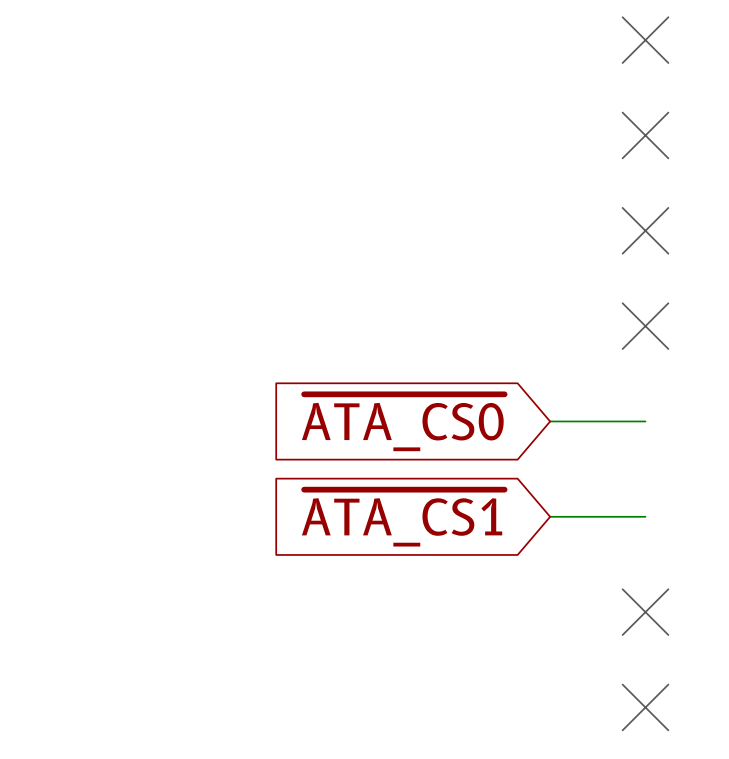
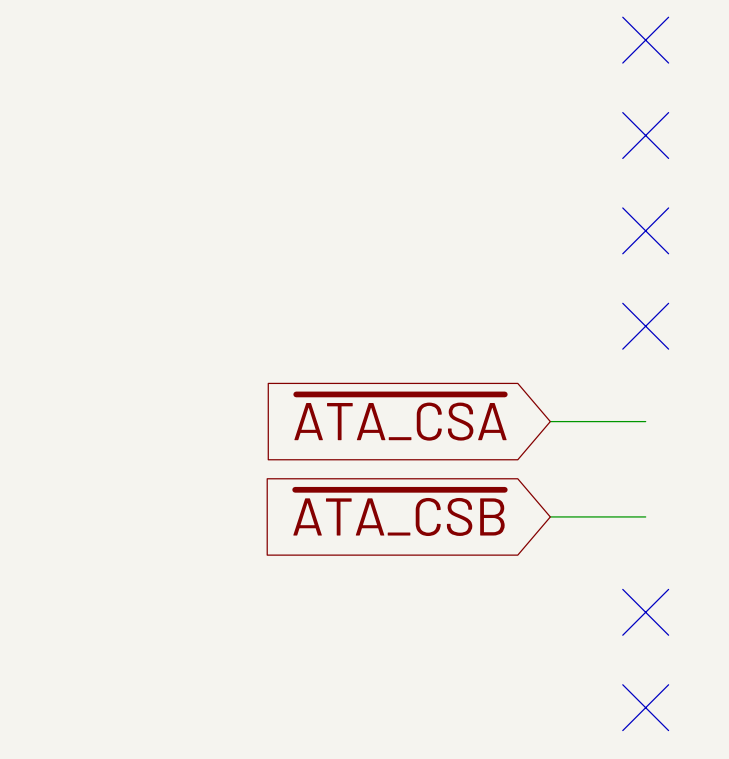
global label: ~{ATA_CS0} (403, 422) -> ~{ATA_CSA} (400, 417)
global label: ~{ATA_CS1} (403, 518) -> ~{ATA_CSB} (398, 512)

